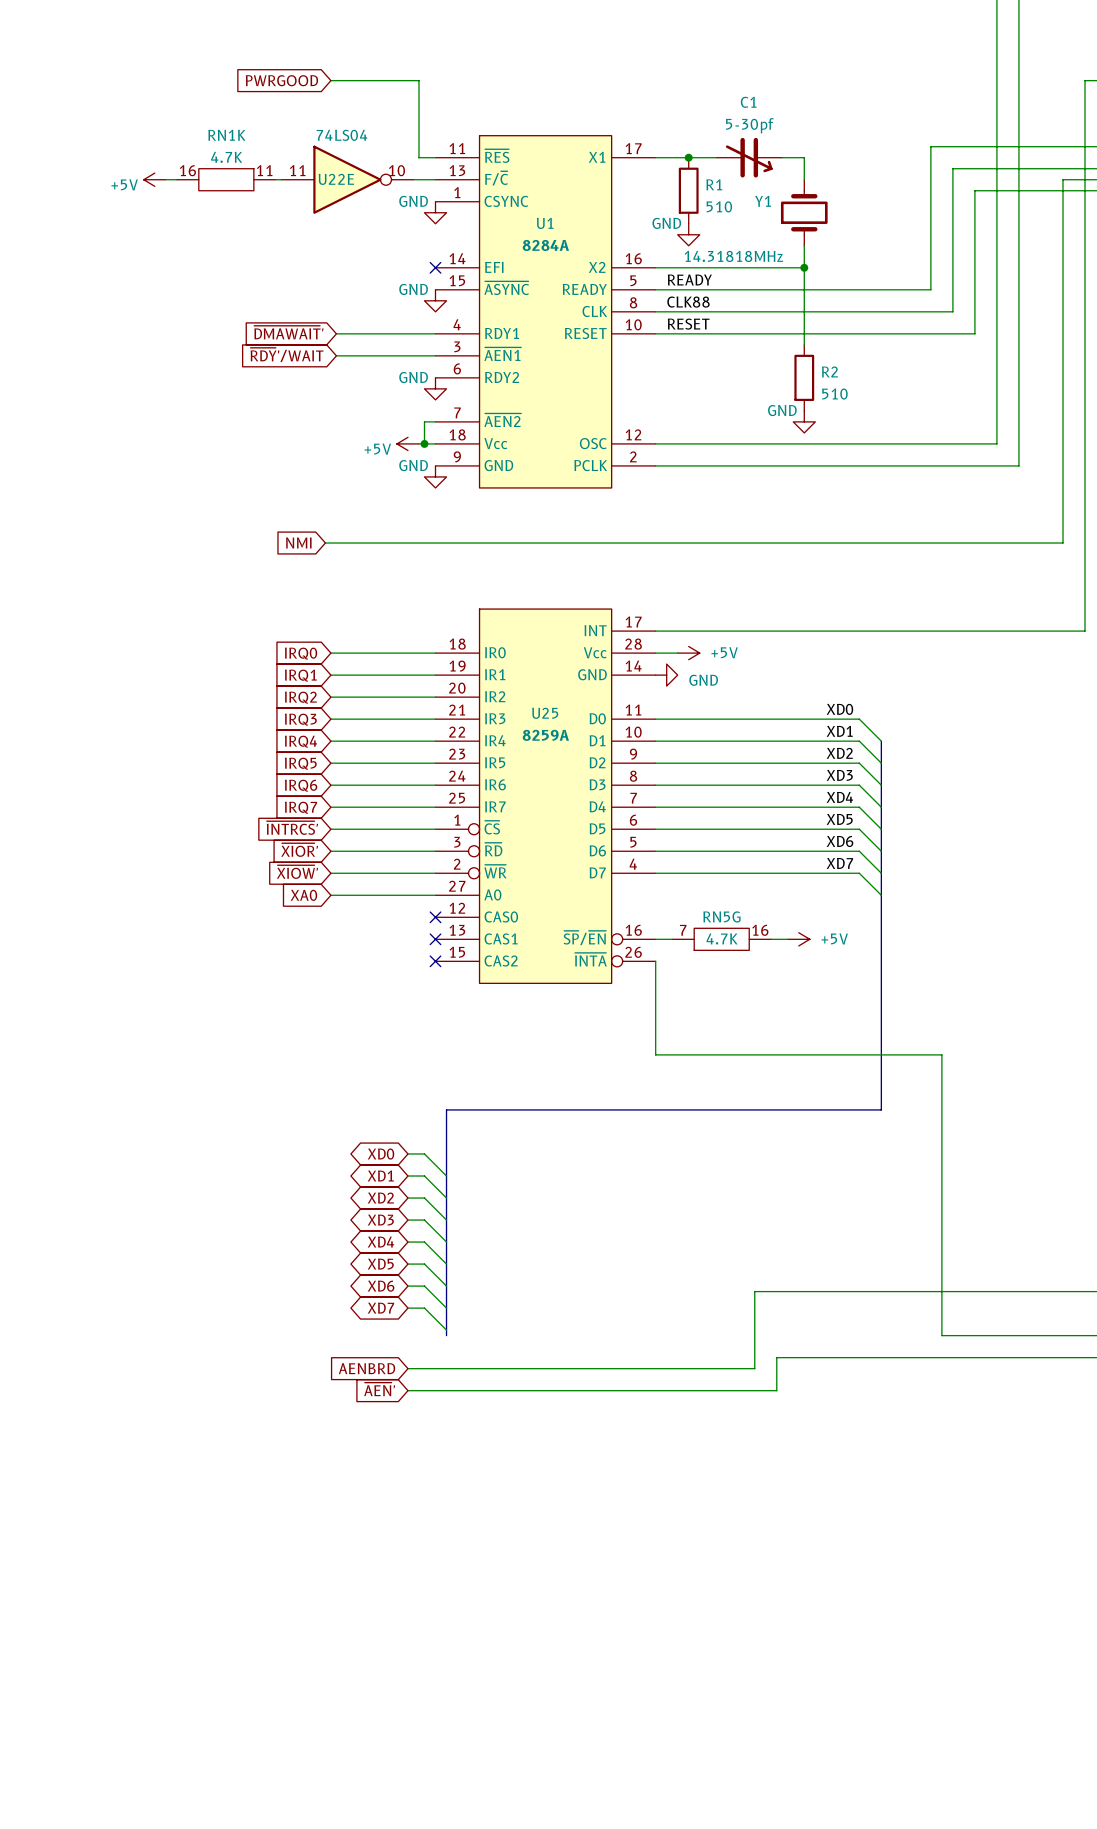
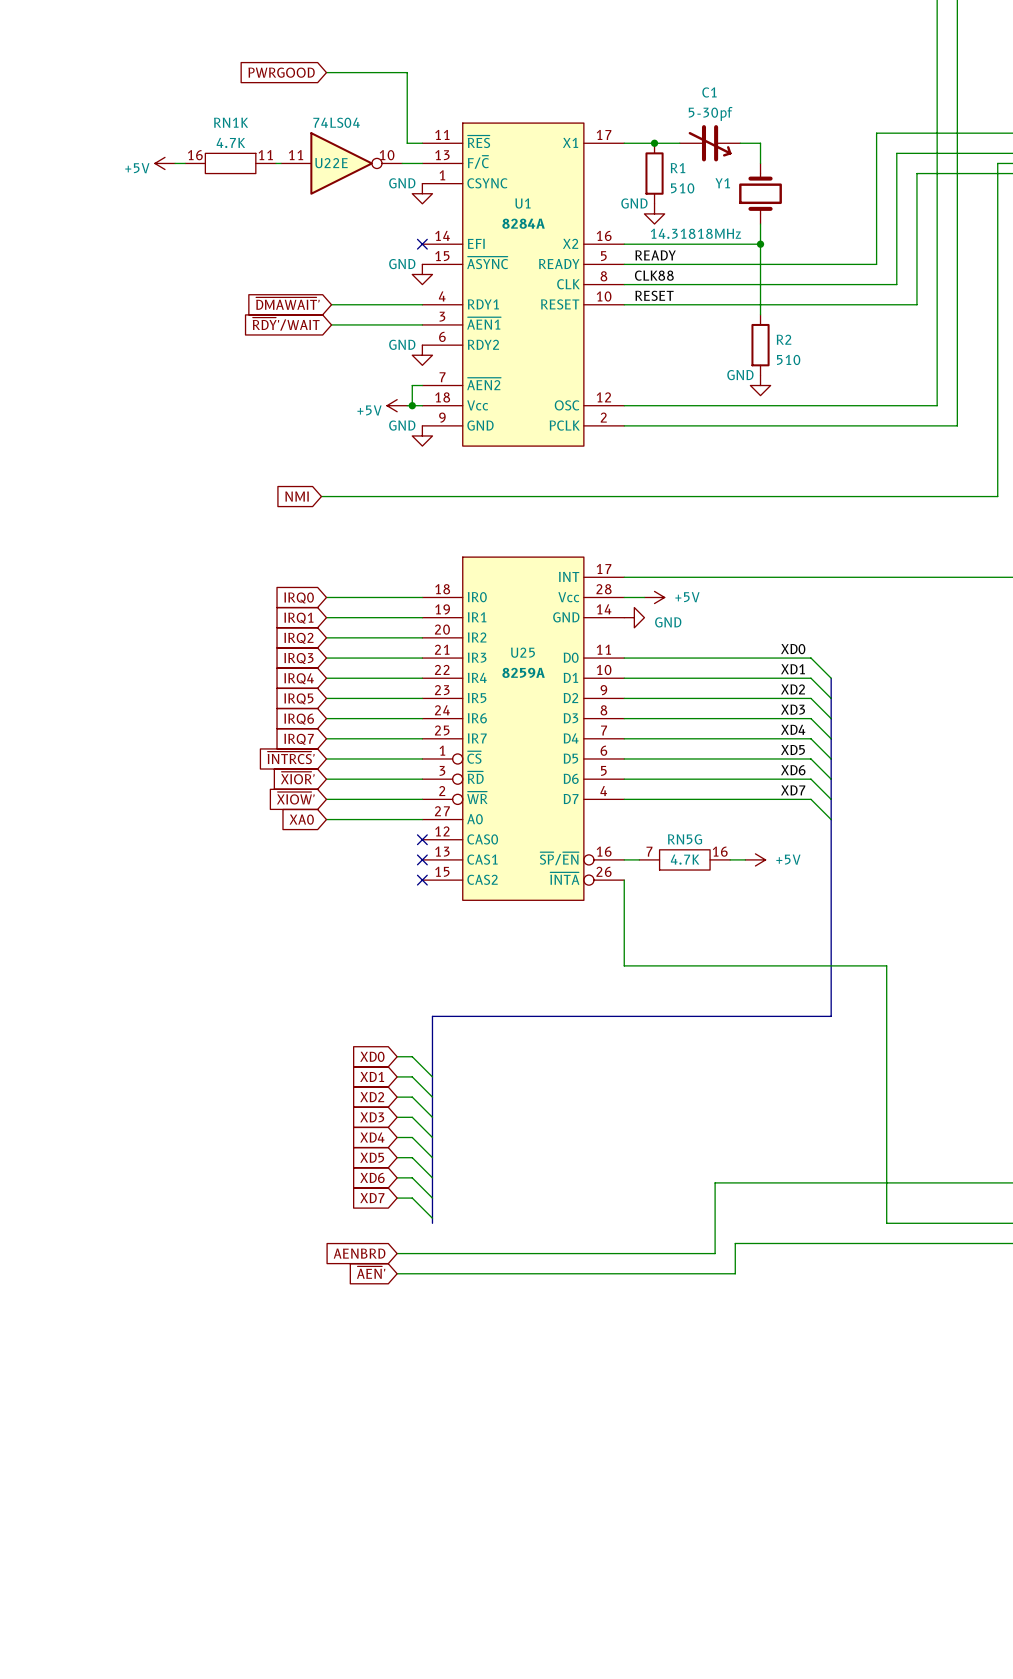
global label shape: bidirectional (380, 1154) -> input (372, 1056)
global label shape: bidirectional (380, 1176) -> input (372, 1076)
global label shape: bidirectional (380, 1198) -> input (372, 1097)
global label shape: bidirectional (380, 1220) -> input (372, 1117)
global label shape: bidirectional (380, 1242) -> input (372, 1137)
global label shape: bidirectional (380, 1264) -> input (372, 1157)
global label shape: bidirectional (381, 1286) -> input (372, 1177)
global label shape: bidirectional (380, 1308) -> input (372, 1198)

